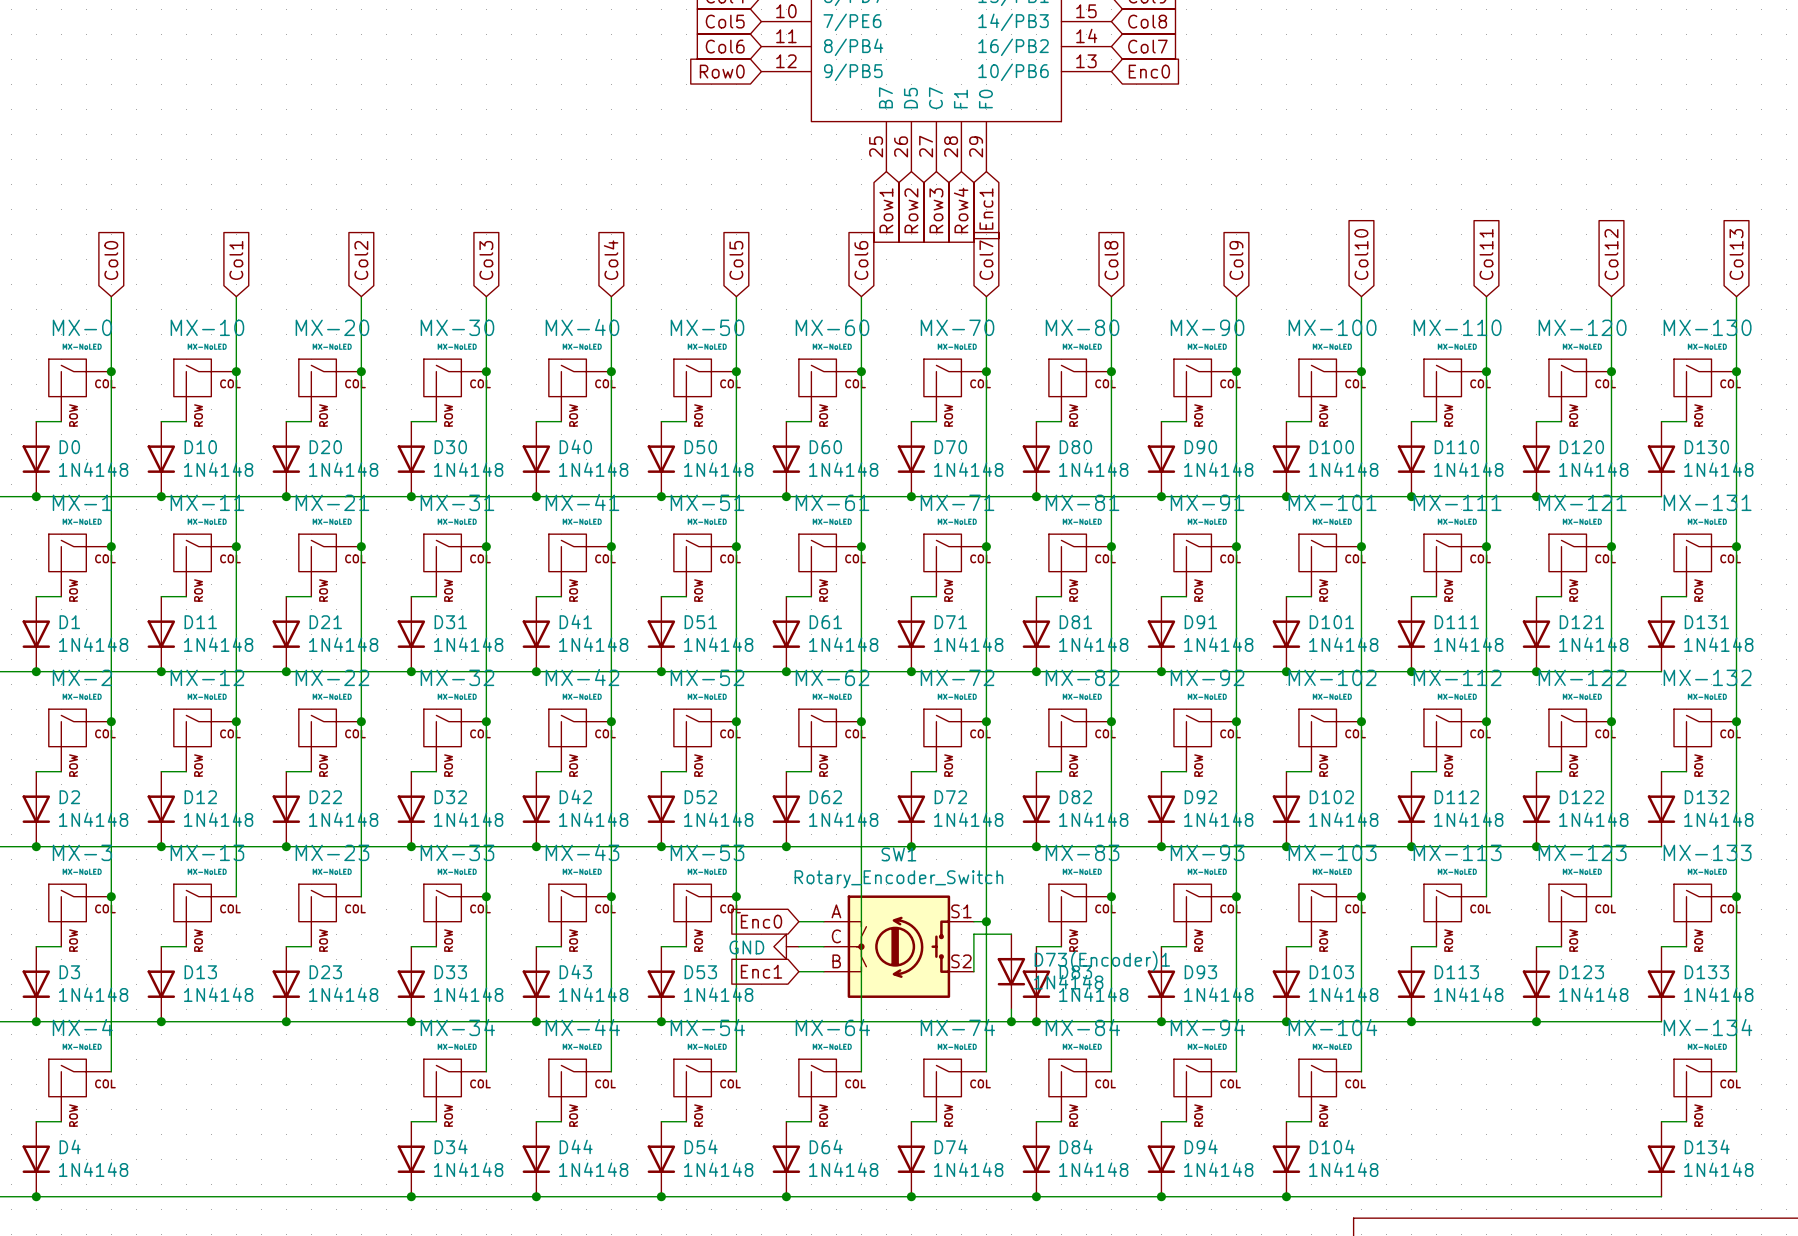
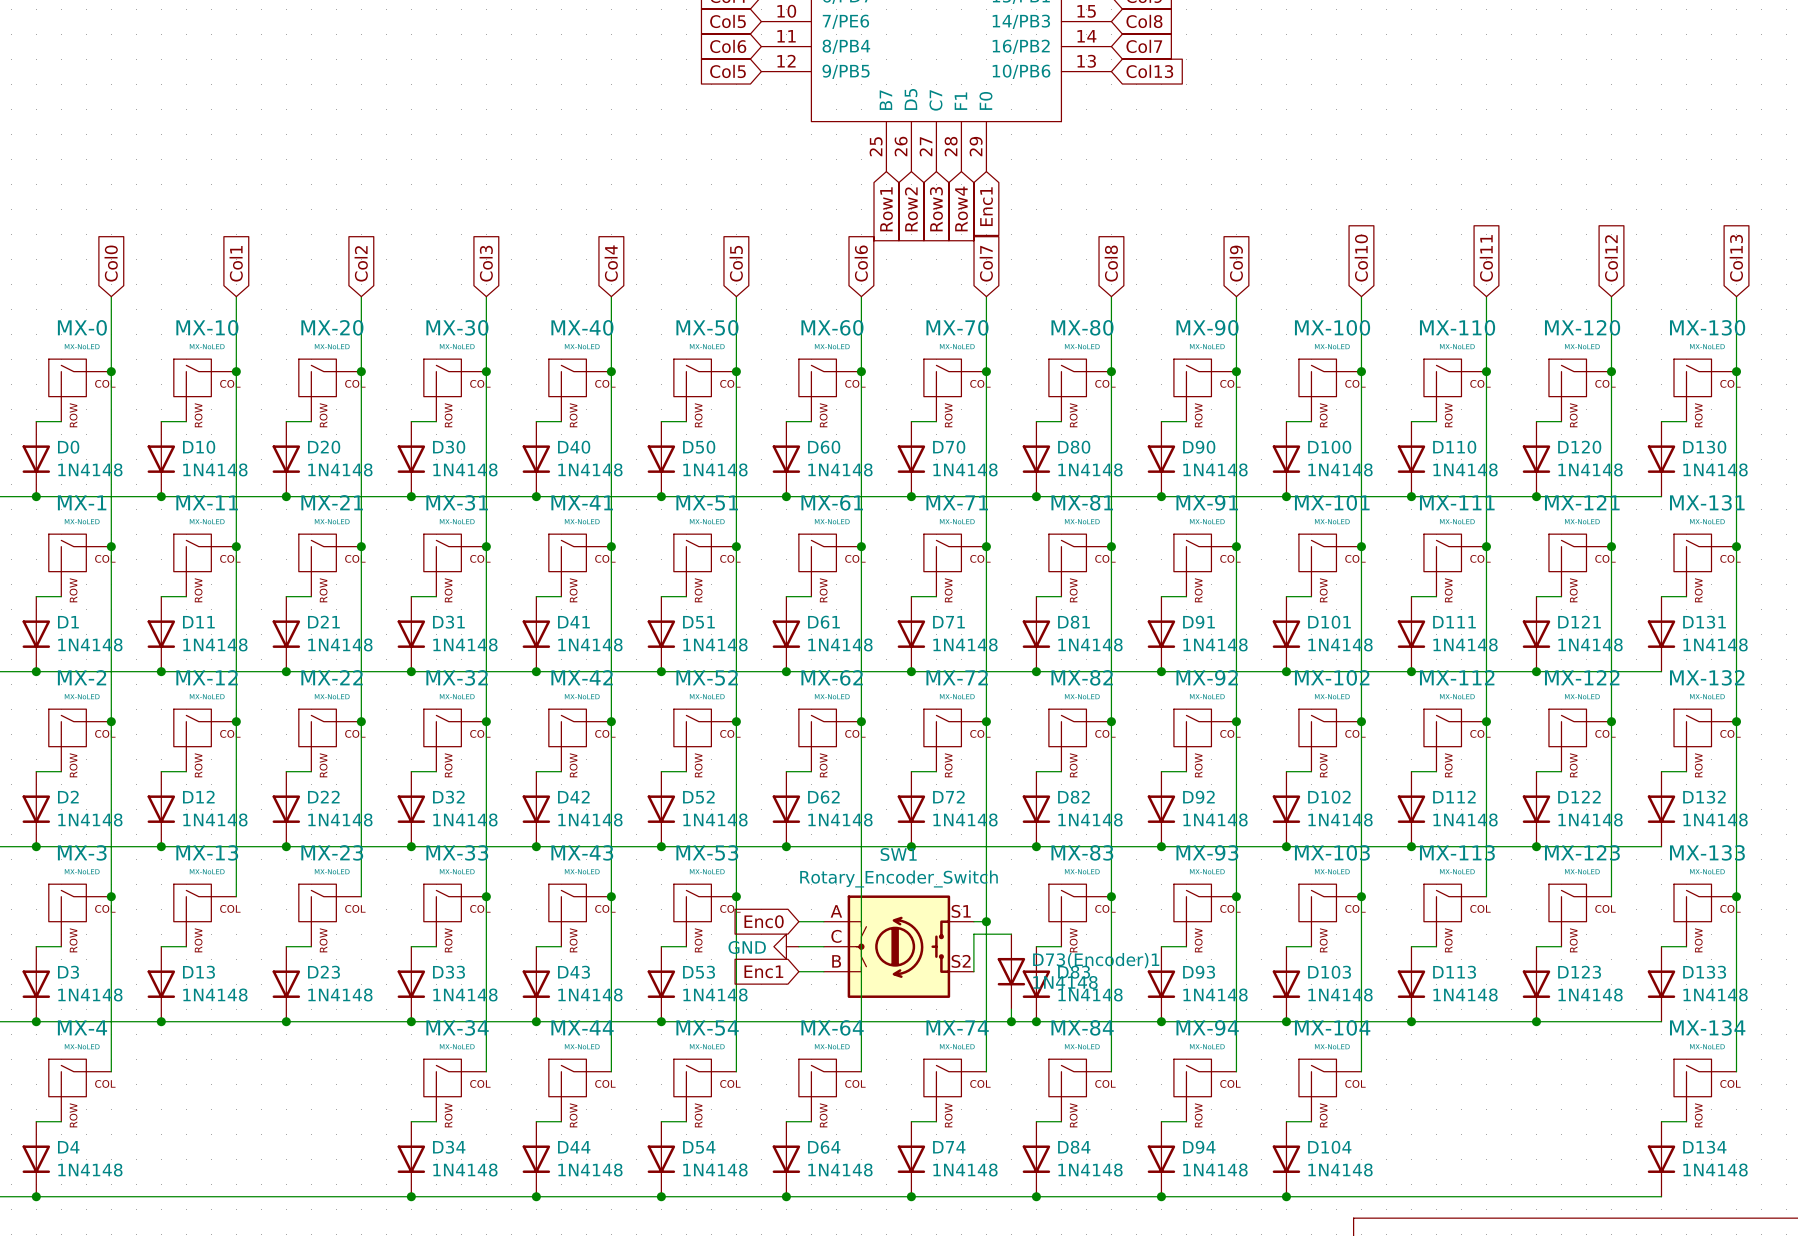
global label: Row0 (722, 71) -> Col5 (727, 71)
global label: Enc0 (1149, 71) -> Col13 (1149, 71)

